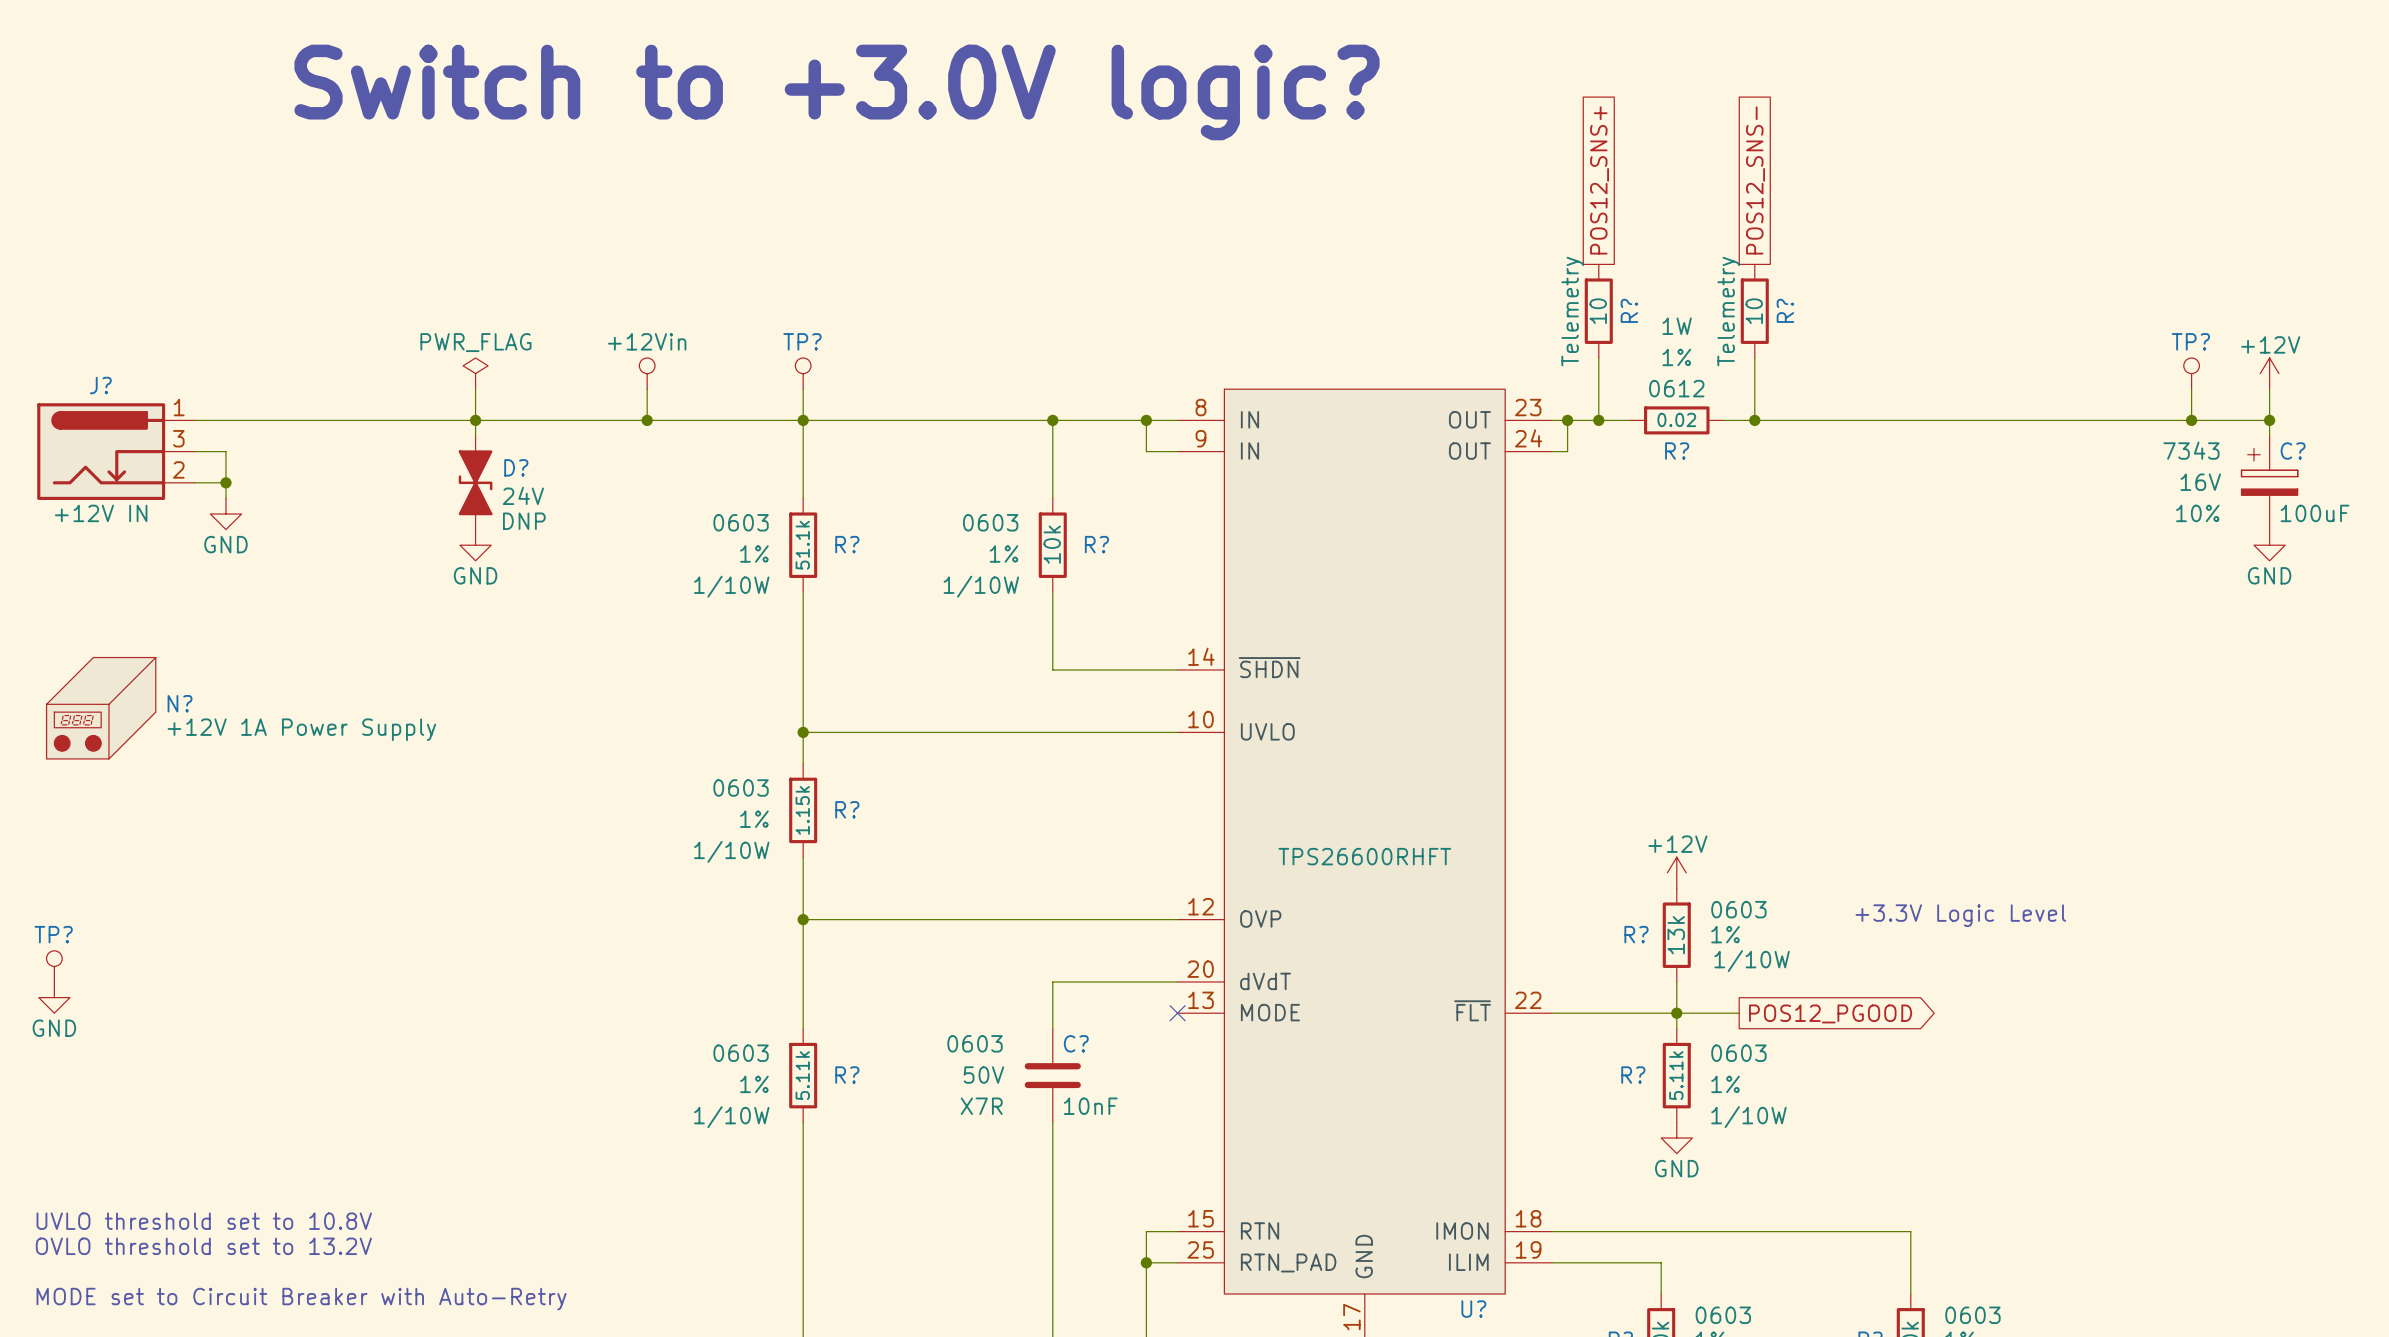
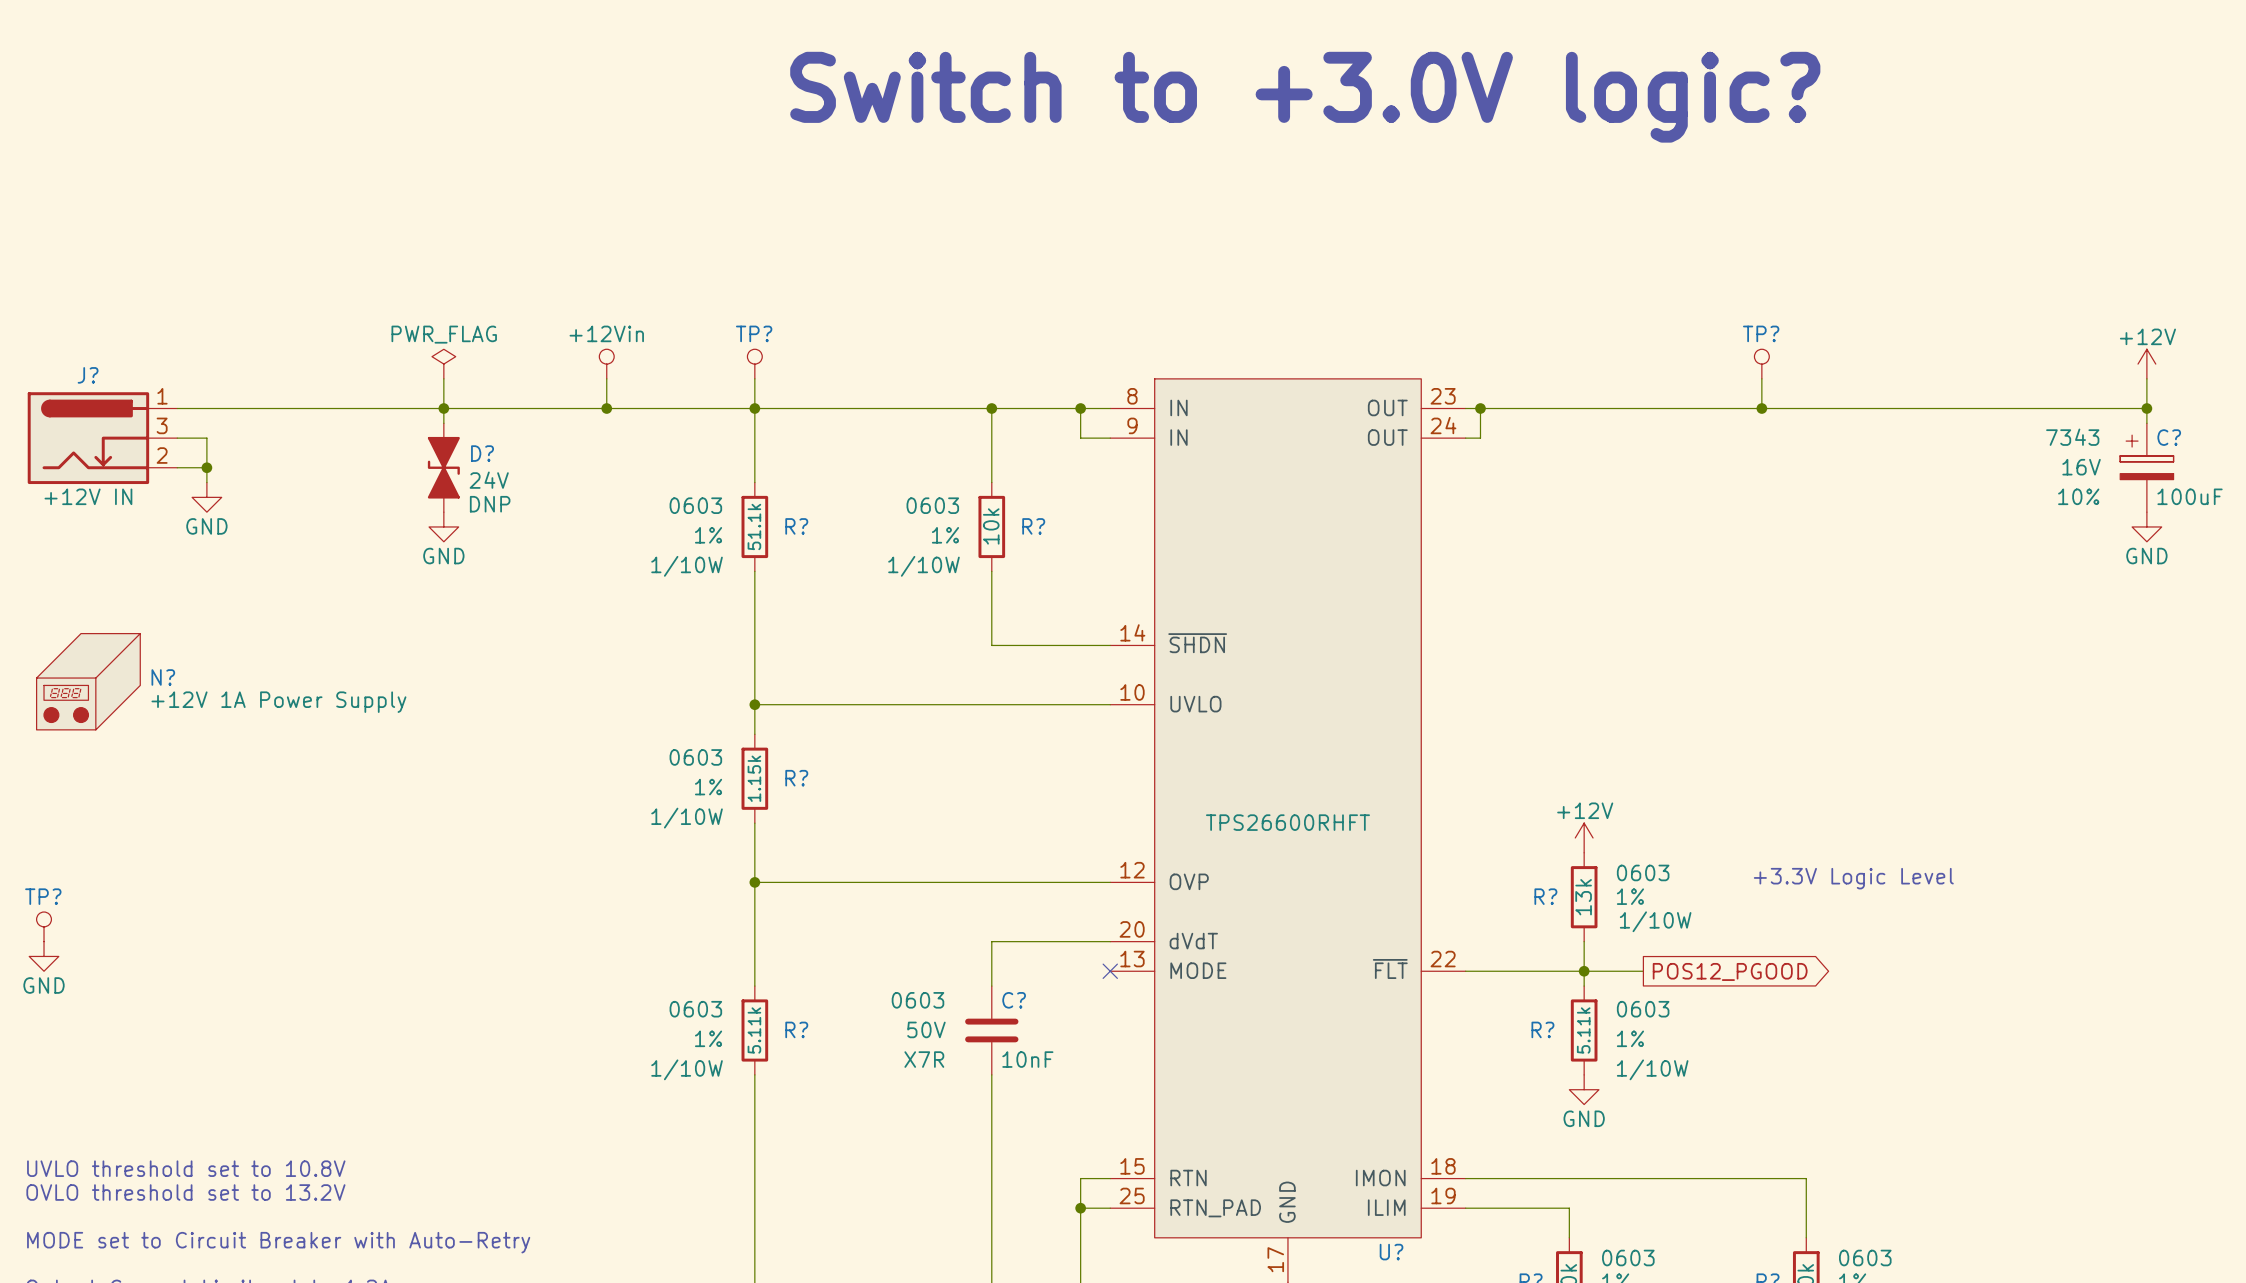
text: Switch to +3.0V logic? (837, 92) -> none
text: none -> Switch to +3.0V logic? (1305, 97)
global label: POS12_SNS+ (1599, 180) -> none
global label: POS12_SNS- (1755, 180) -> none
R?: 10 (1598, 311) -> none
R?: 10 (1754, 311) -> none
wire: (1598, 358) (1598, 420) -> none
wire: (1754, 358) (1754, 420) -> none
TP?: none -> (1761, 364)
TP?: (2191, 373) -> none
wire: none -> (1761, 378) (1761, 408)
wire: (2191, 389) (2191, 420) -> none
junction: (1598, 420) -> none
wire: none -> (1539, 408) (1628, 408)
R?: 0.02 (1676, 420) -> none
junction: (1754, 420) -> none
junction: none -> (1761, 408)
junction: (2191, 420) -> none

